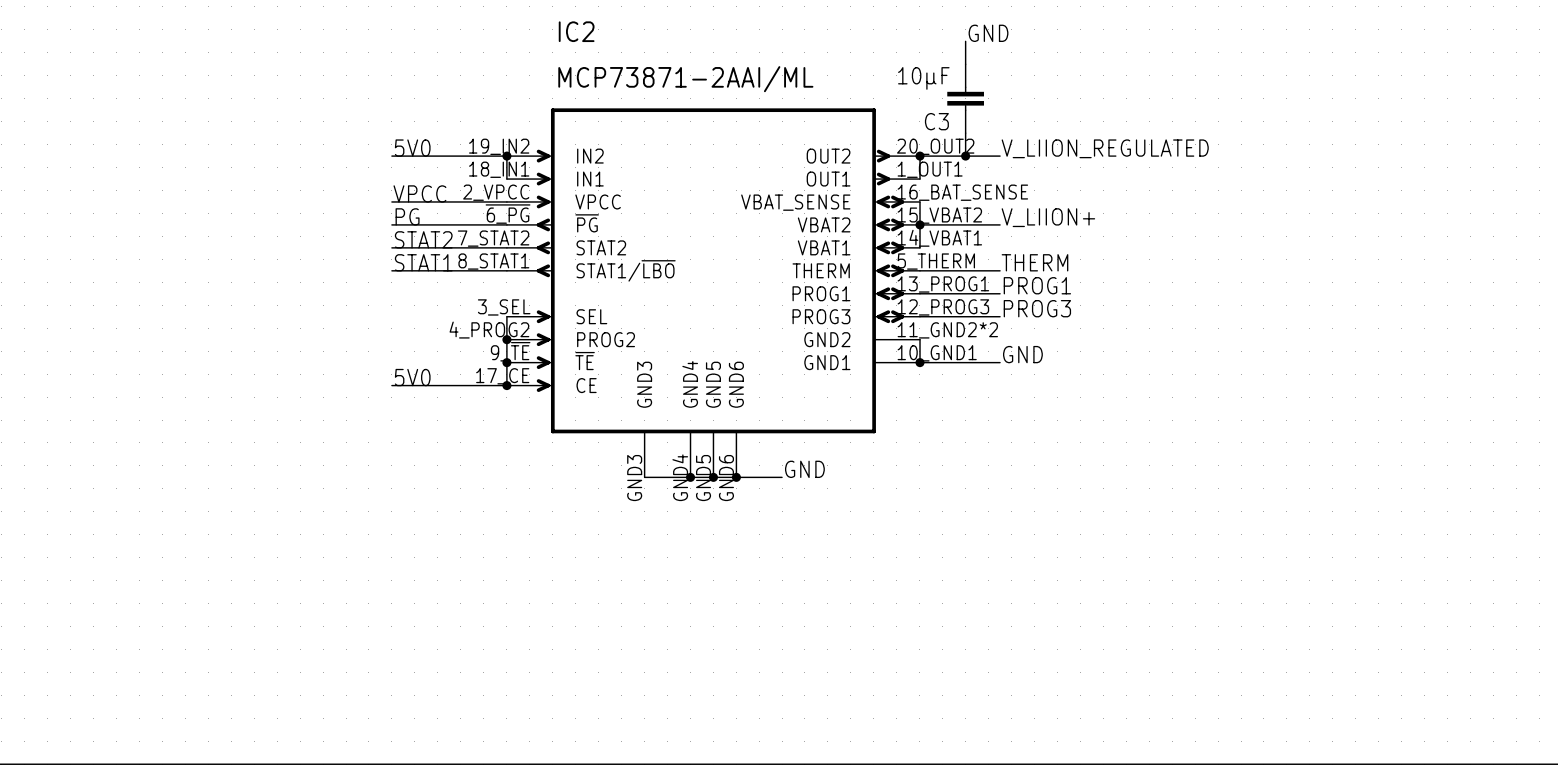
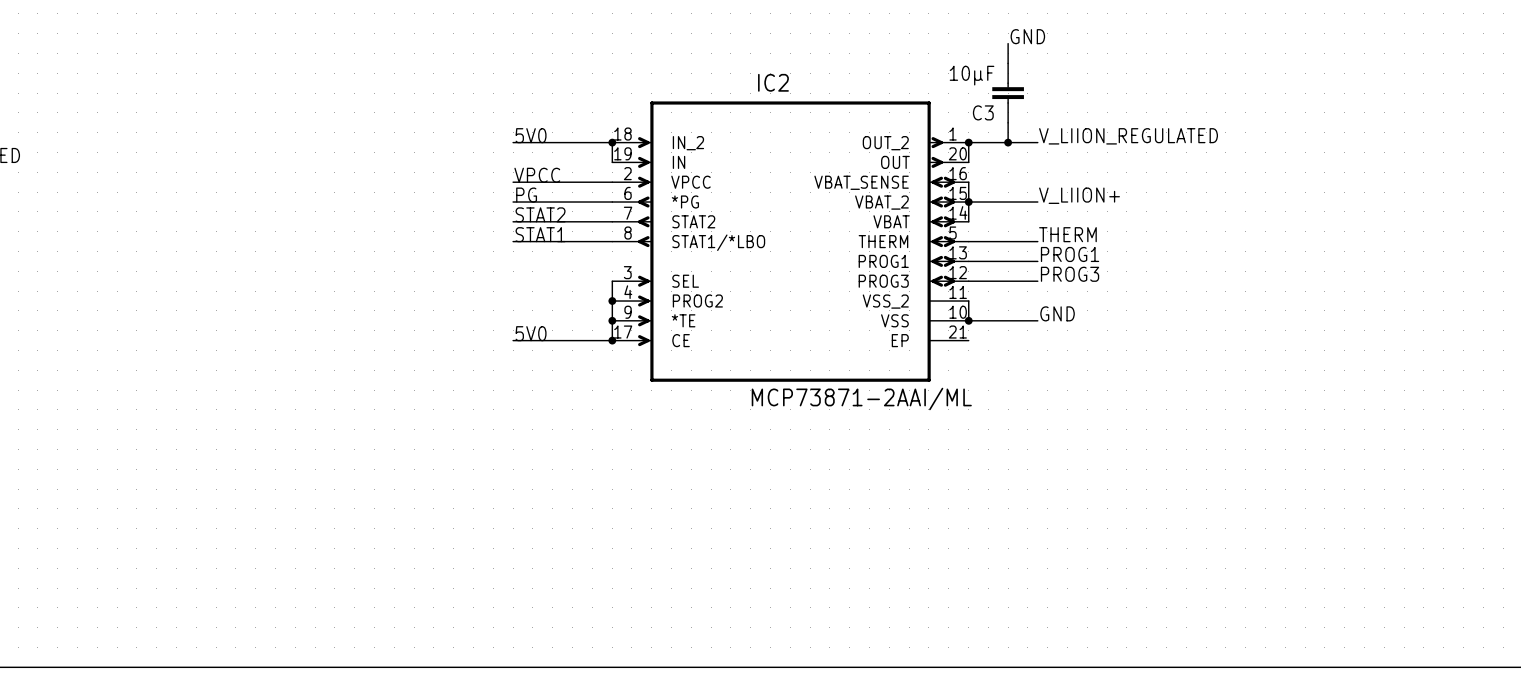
IC2 name position: IC2 (576, 31) -> IC2 (773, 82)
IC2 value position: MCP73871-2AAI/ML (685, 79) -> MCP73871-2AAI/ML (861, 398)
IC2 symbol: [506, 108, 921, 478] -> [612, 101, 969, 382]
label: GND (804, 469) -> none
wire: (644, 477) (782, 477) -> none
junction: (690, 477) -> none
junction: (713, 477) -> none
junction: (736, 477) -> none

